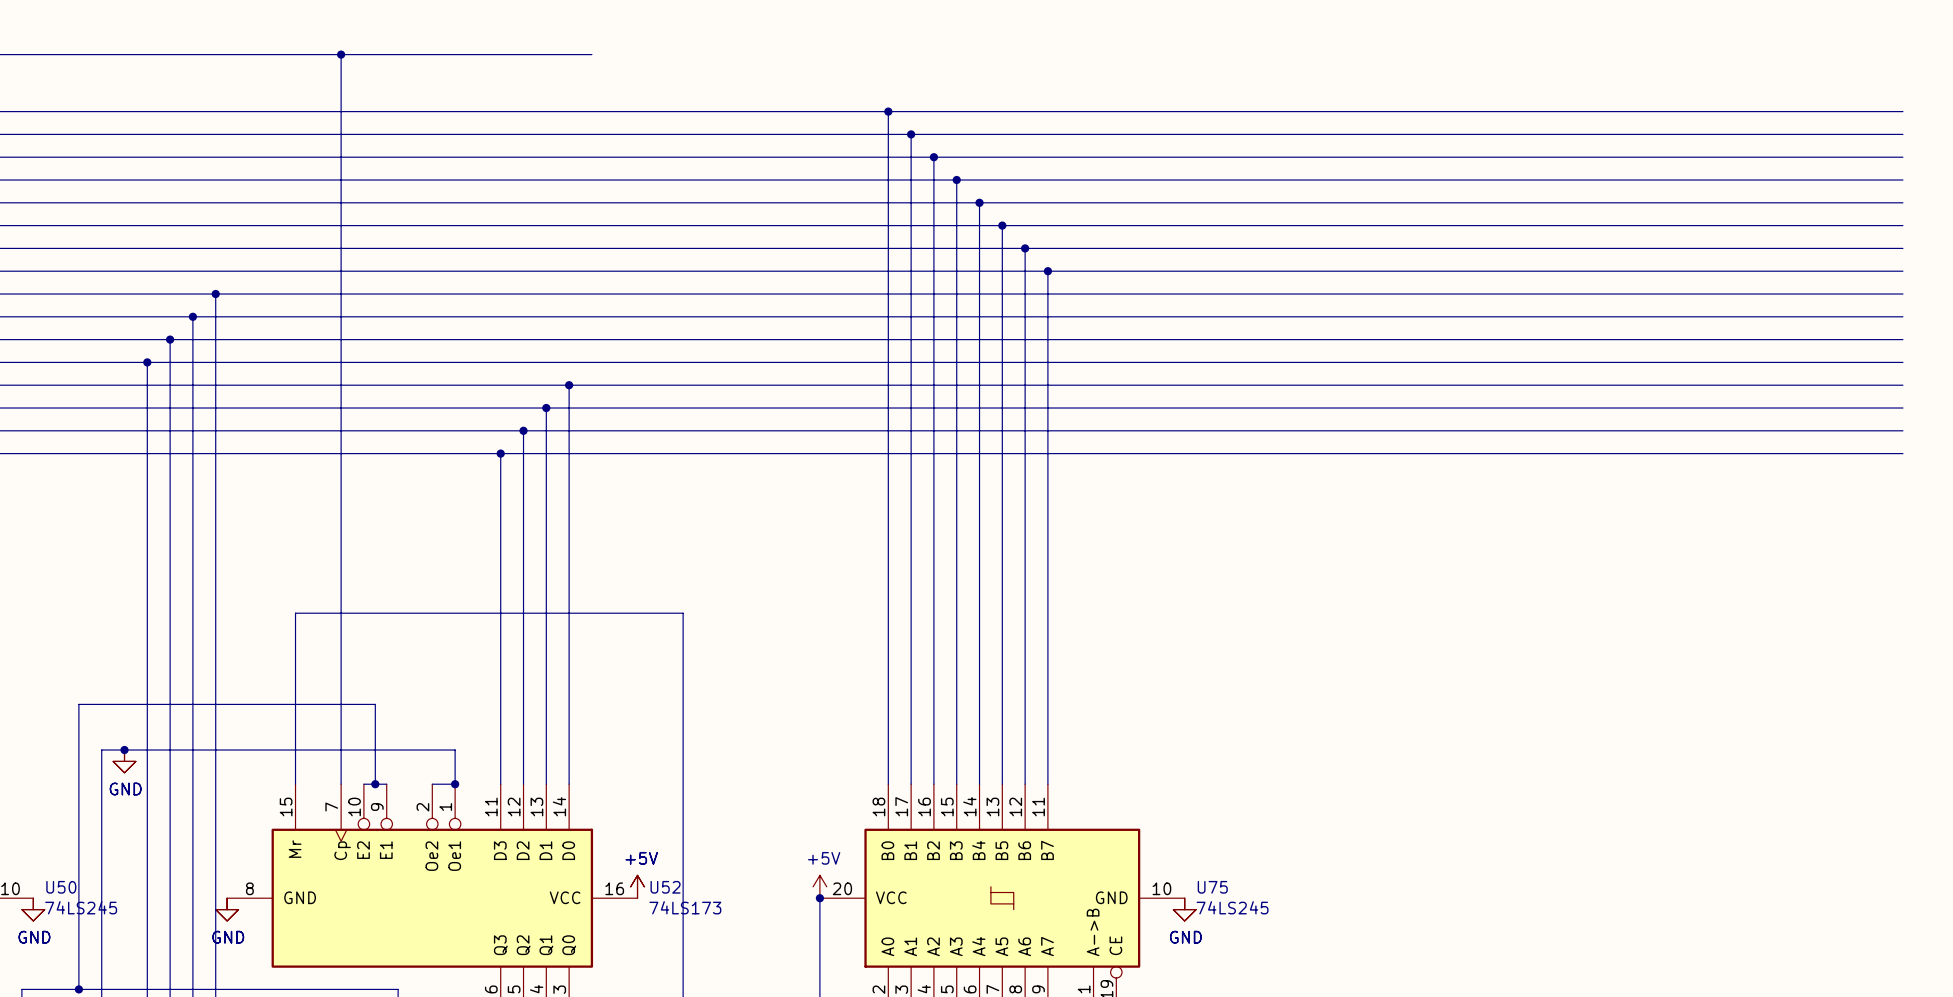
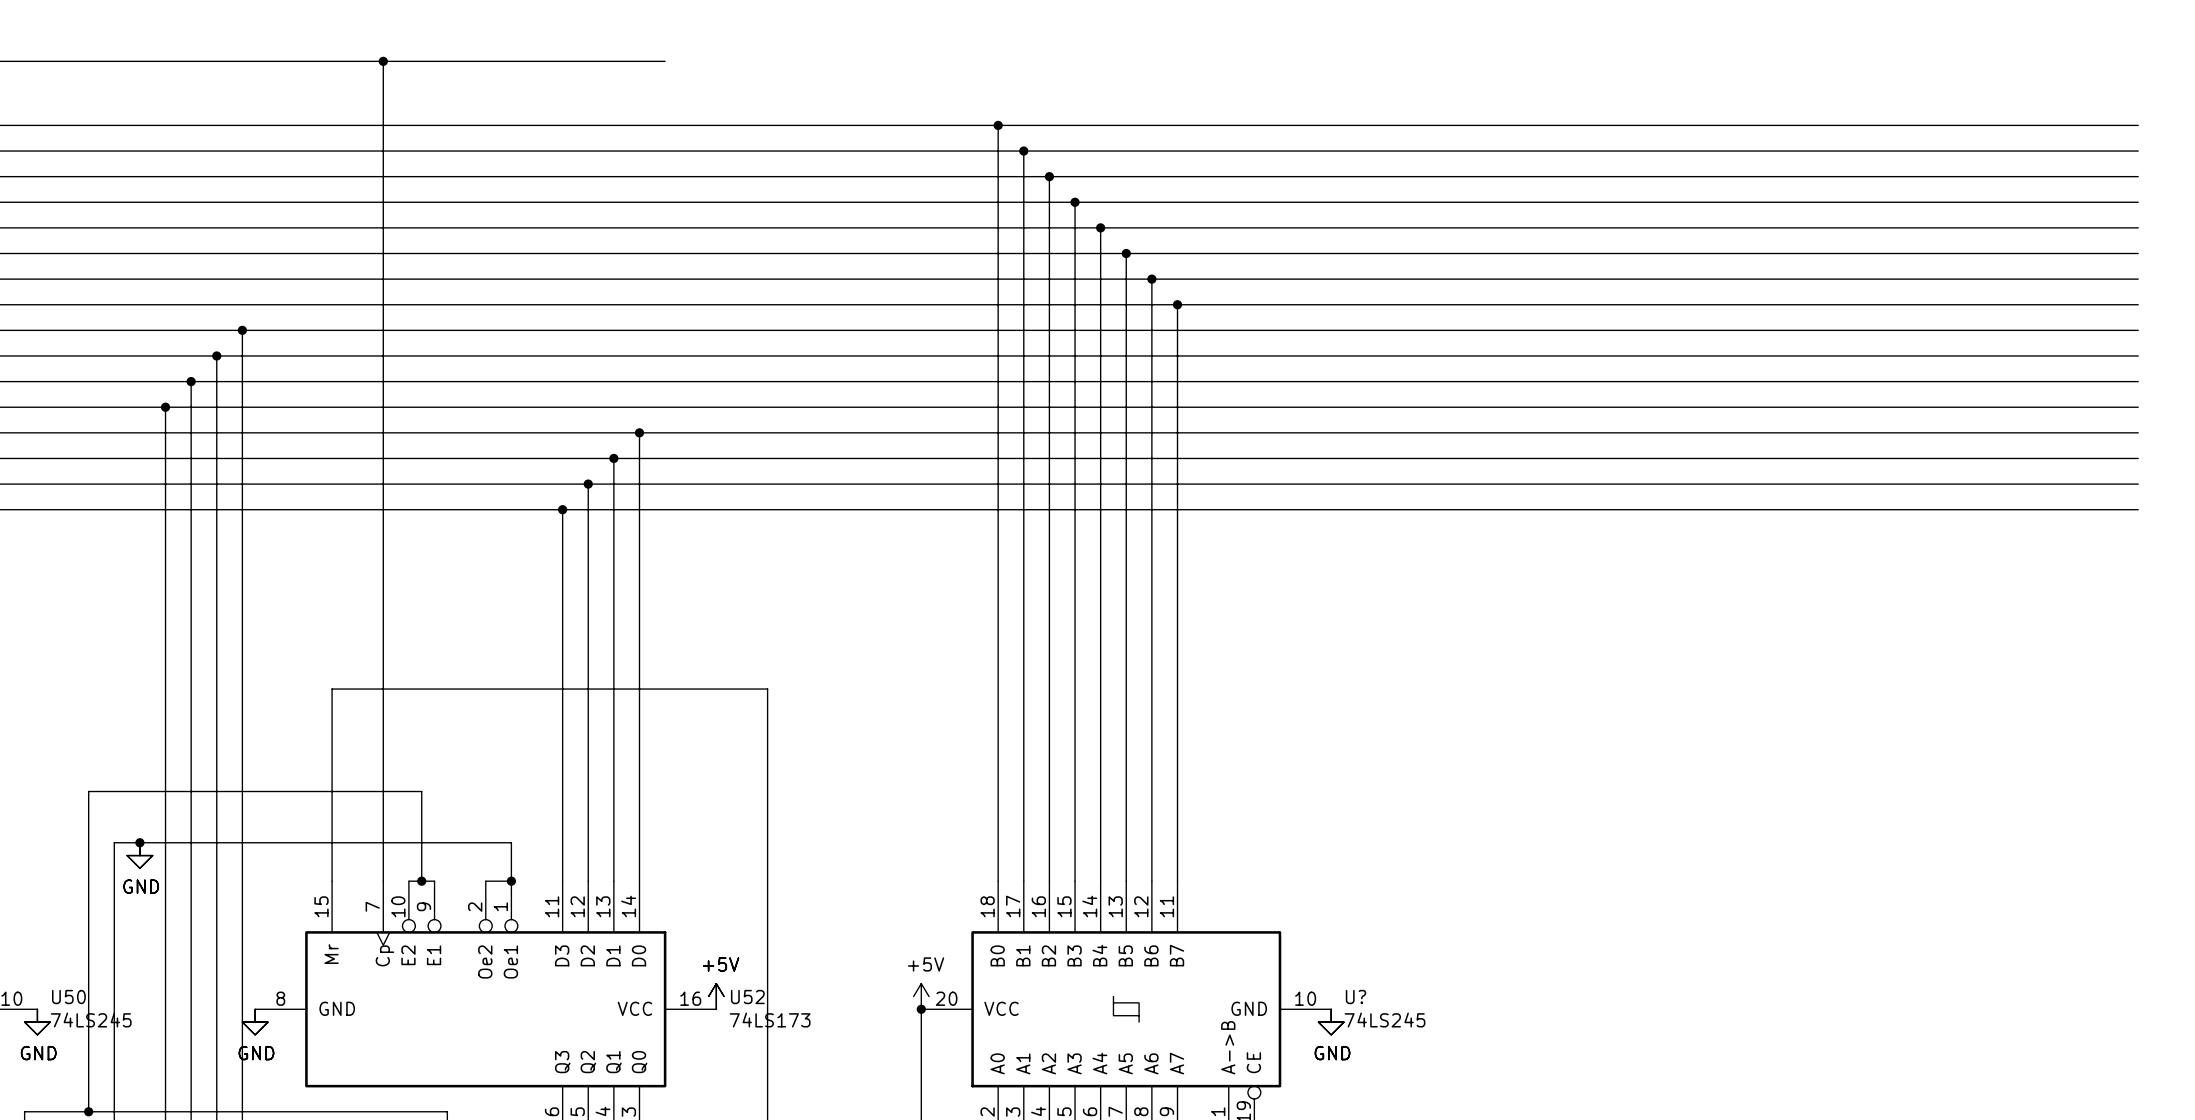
U75 name: U75 (1212, 887) -> U? (1356, 997)

